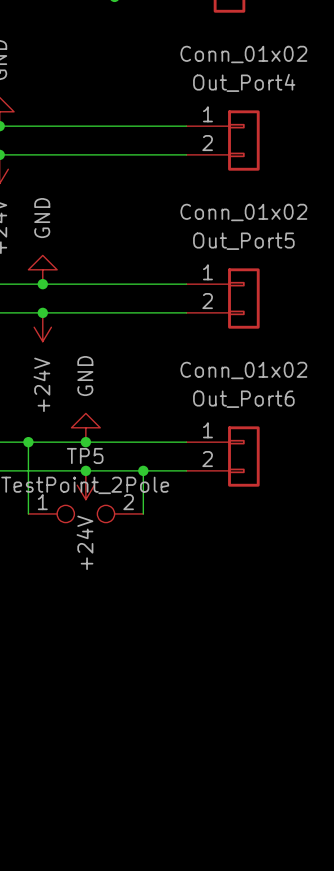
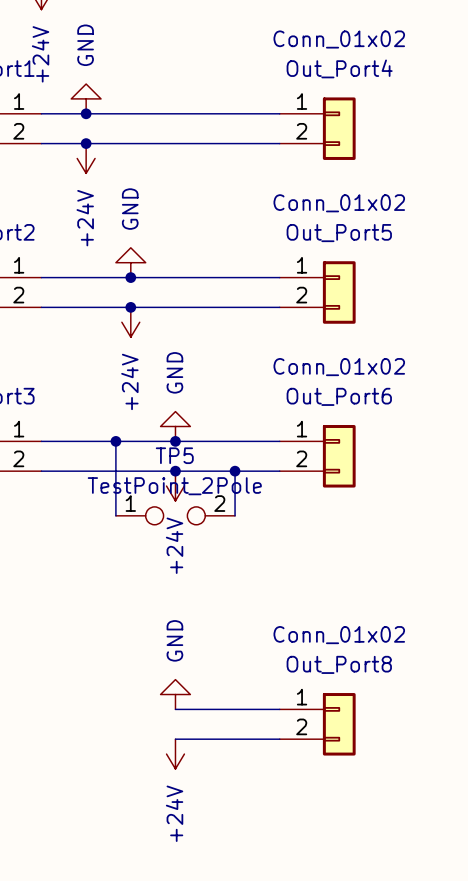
power symbol: none -> GND (175, 694)
wire: none -> (175, 709) (279, 709)
Out_Port8: none -> Conn_01x02 (317, 724)
wire: none -> (175, 739) (279, 739)
power symbol: none -> +24V (175, 754)

